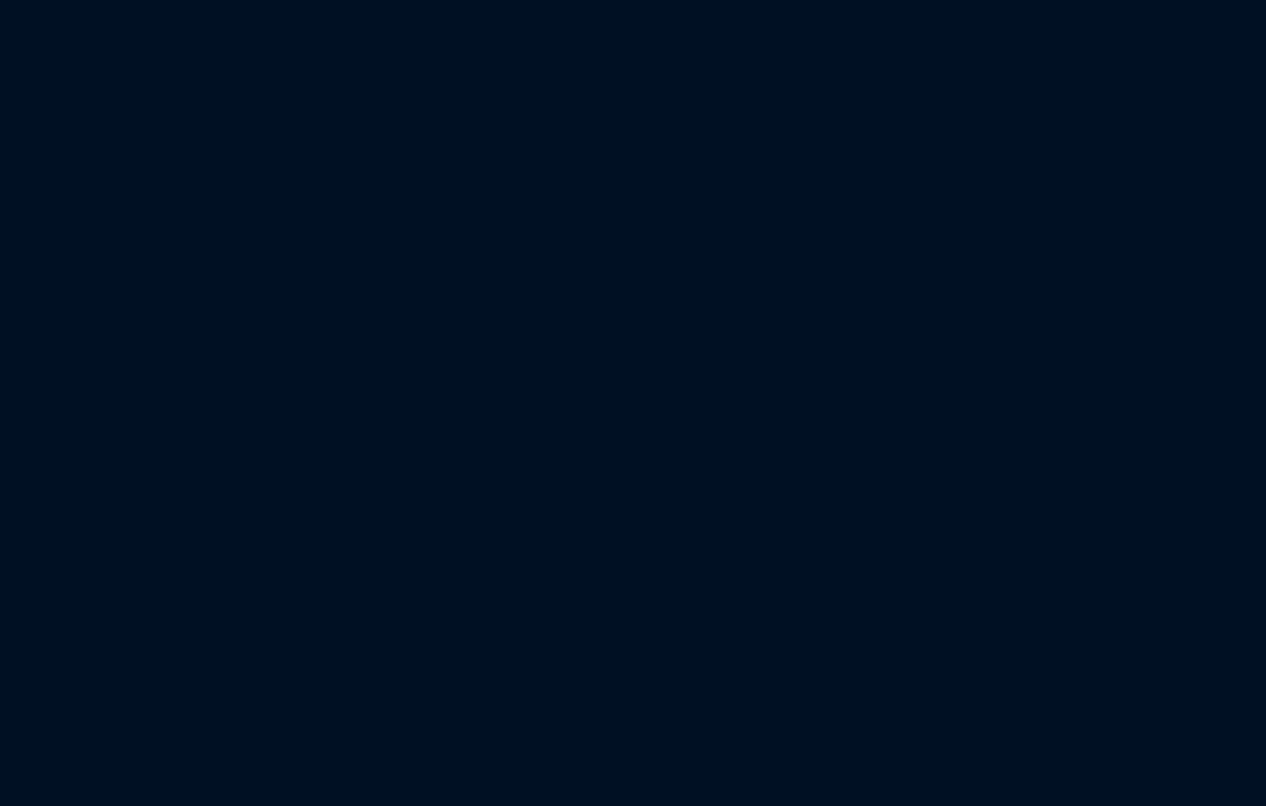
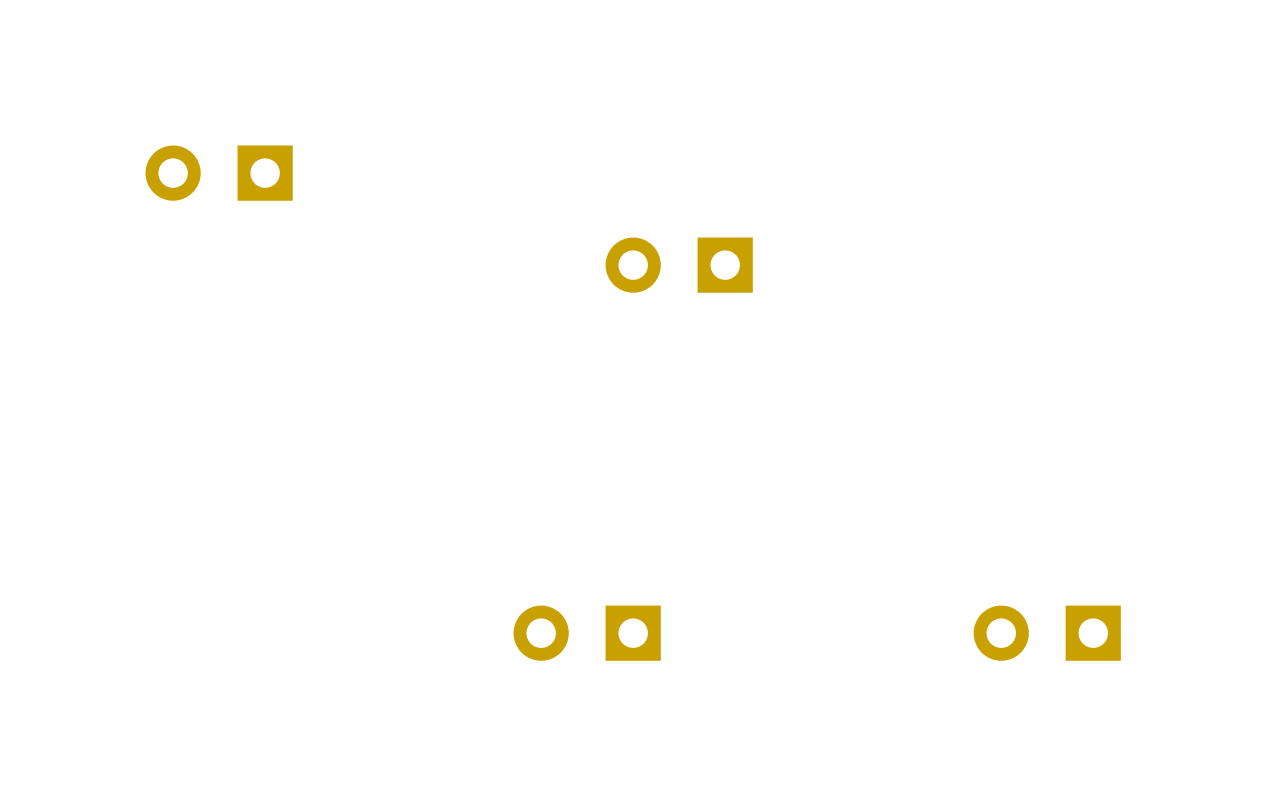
part: none -> (219, 173)
part: none -> (679, 265)
part: none -> (587, 633)
part: none -> (1047, 633)

